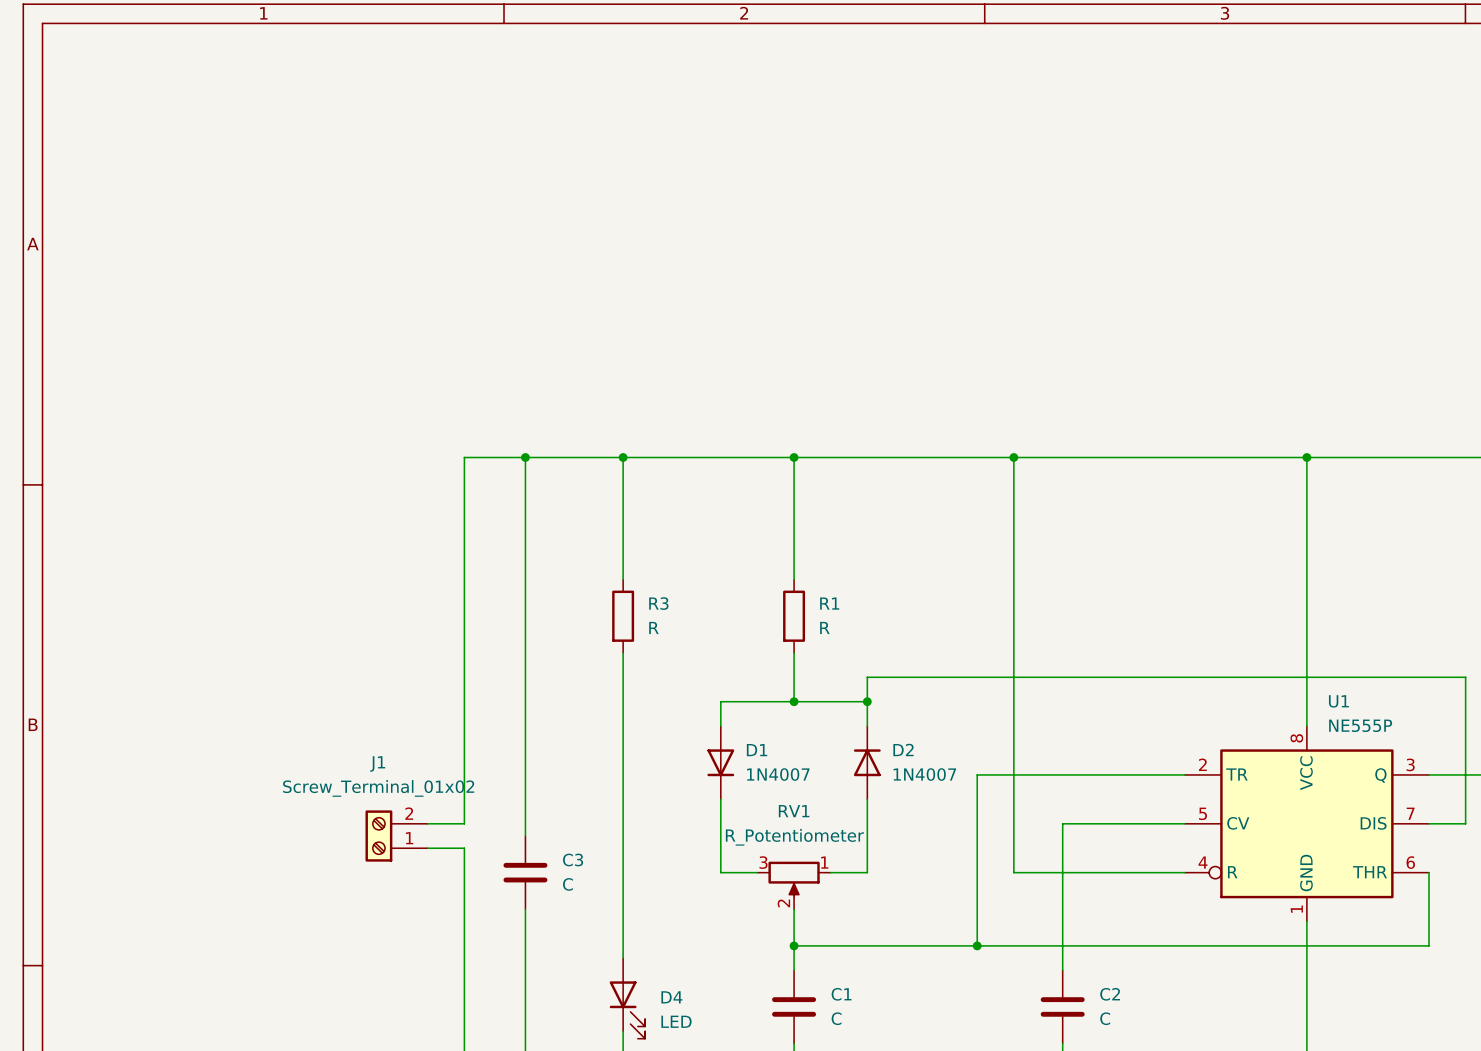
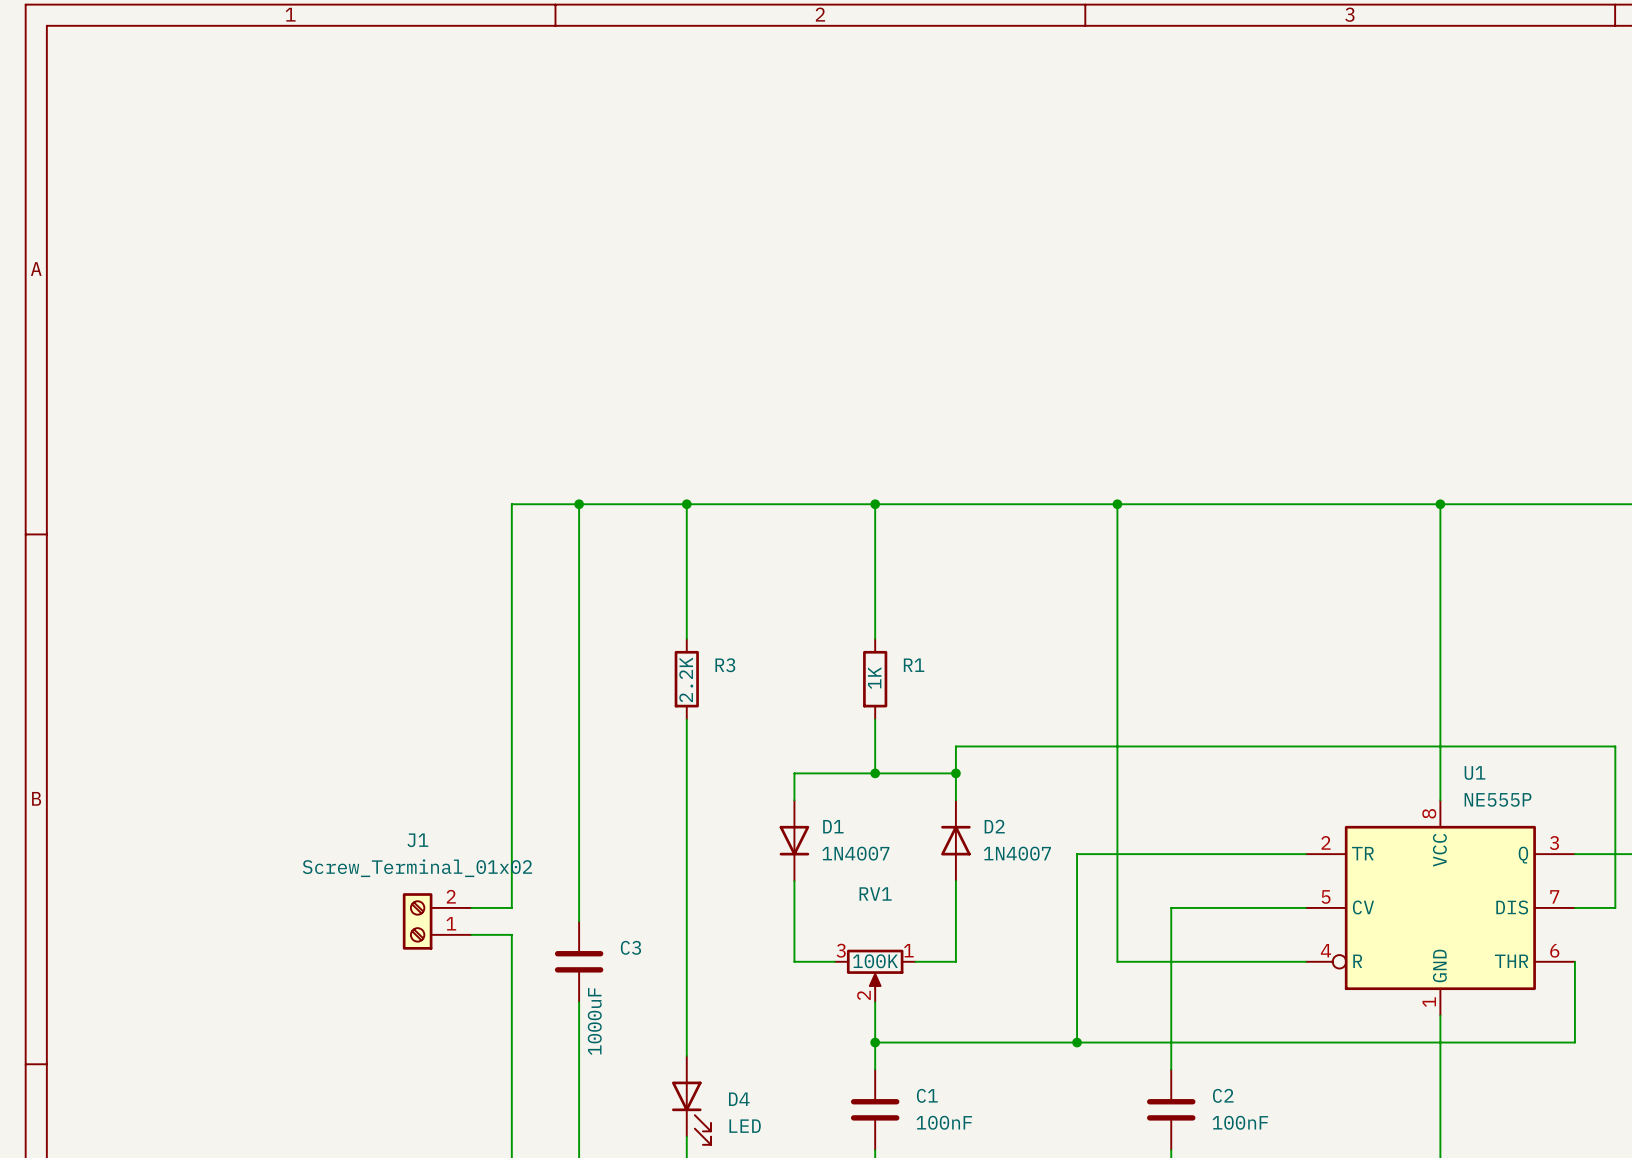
R3 value: R (653, 627) -> 2.2K (686, 679)
R1 value: R (824, 627) -> 1K (874, 678)
RV1 value: R_Potentiometer (794, 837) -> 100K (875, 961)
C3 value: C (567, 884) -> 1000uF (594, 1021)
C1 value: C (836, 1018) -> 100nF (944, 1122)
C2 value: C (1105, 1018) -> 100nF (1240, 1122)

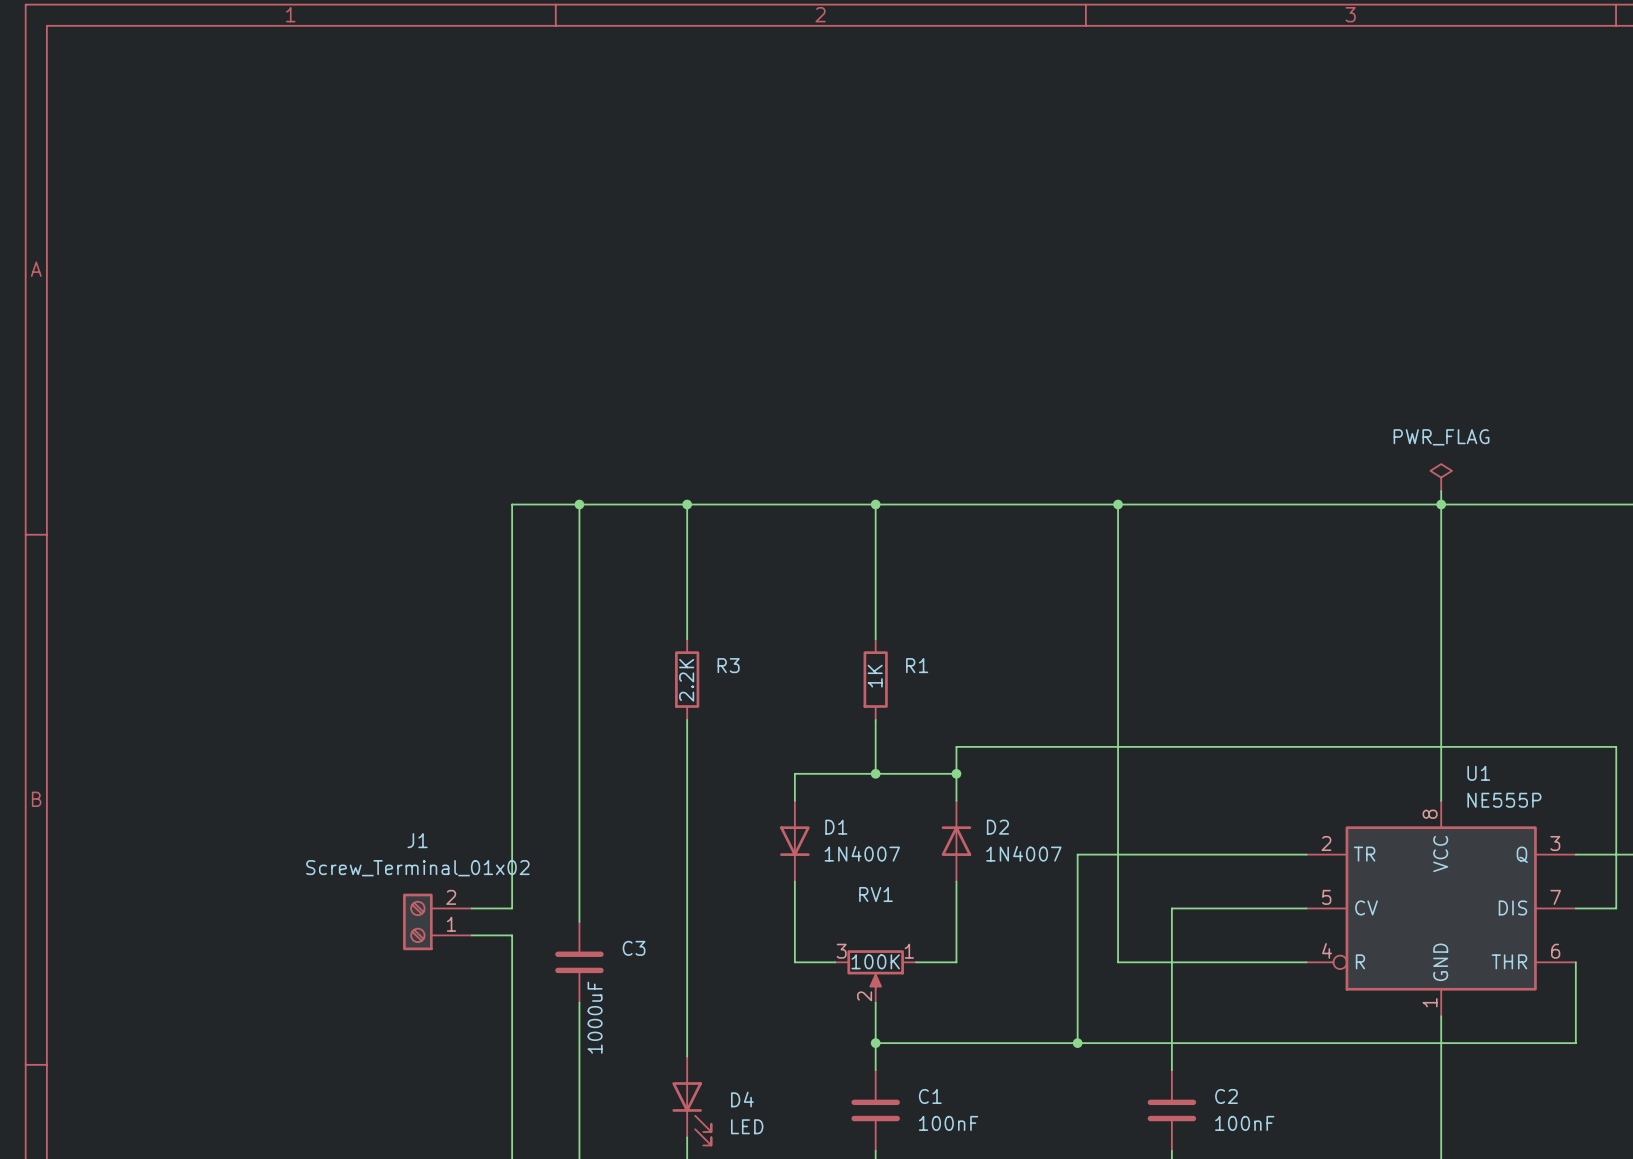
power symbol: none -> PWR_FLAG (1441, 477)
wire: none -> (1441, 491) (1441, 504)

